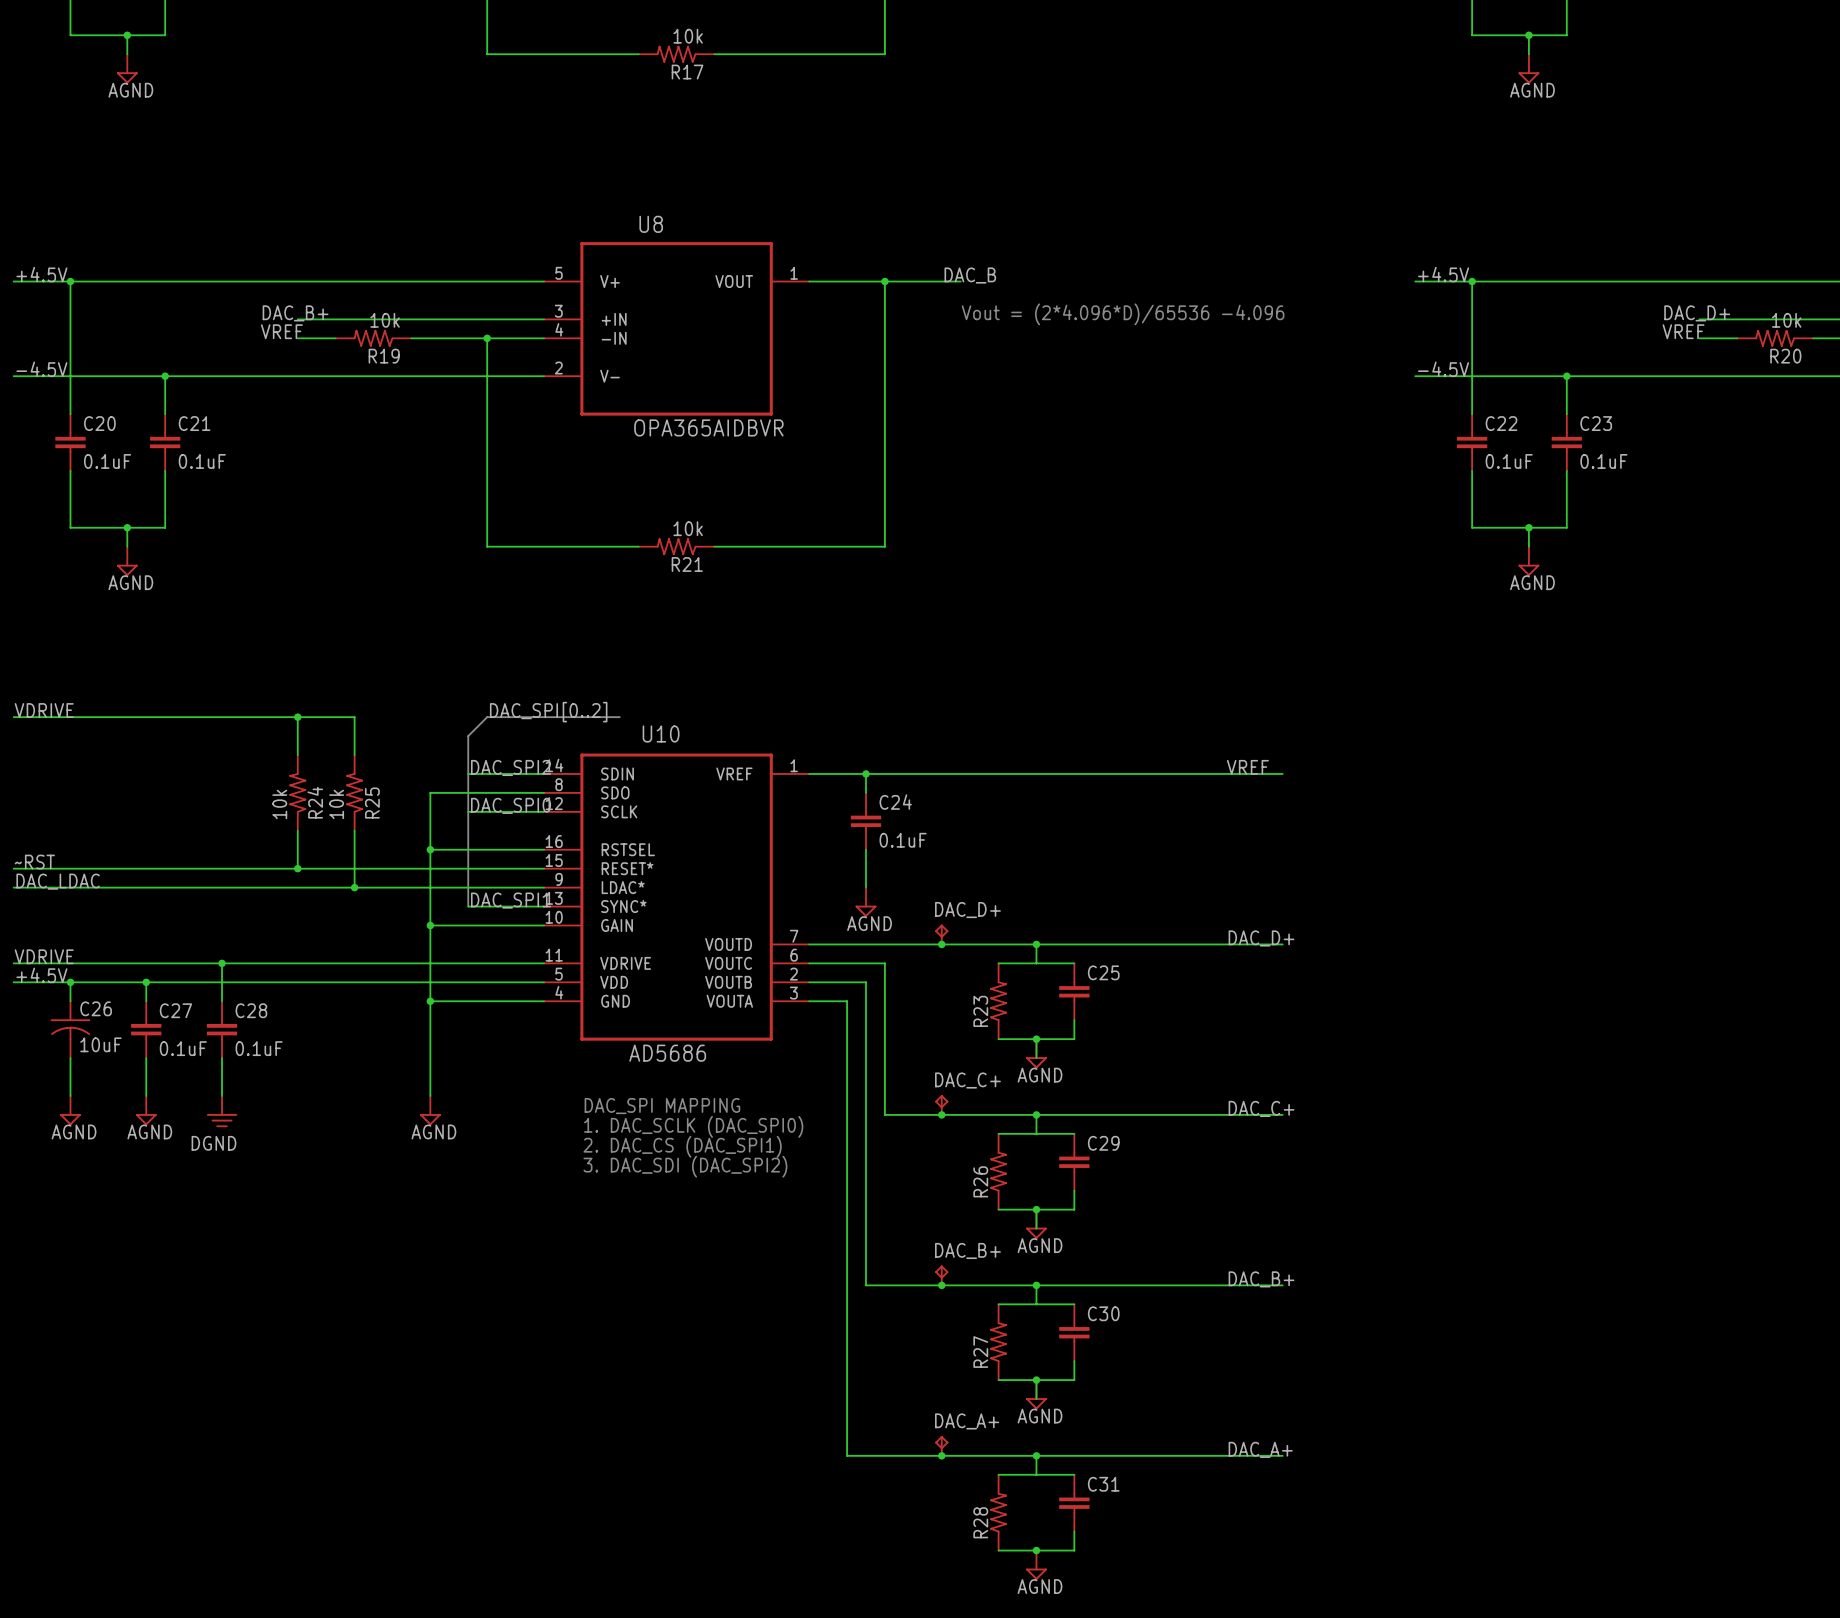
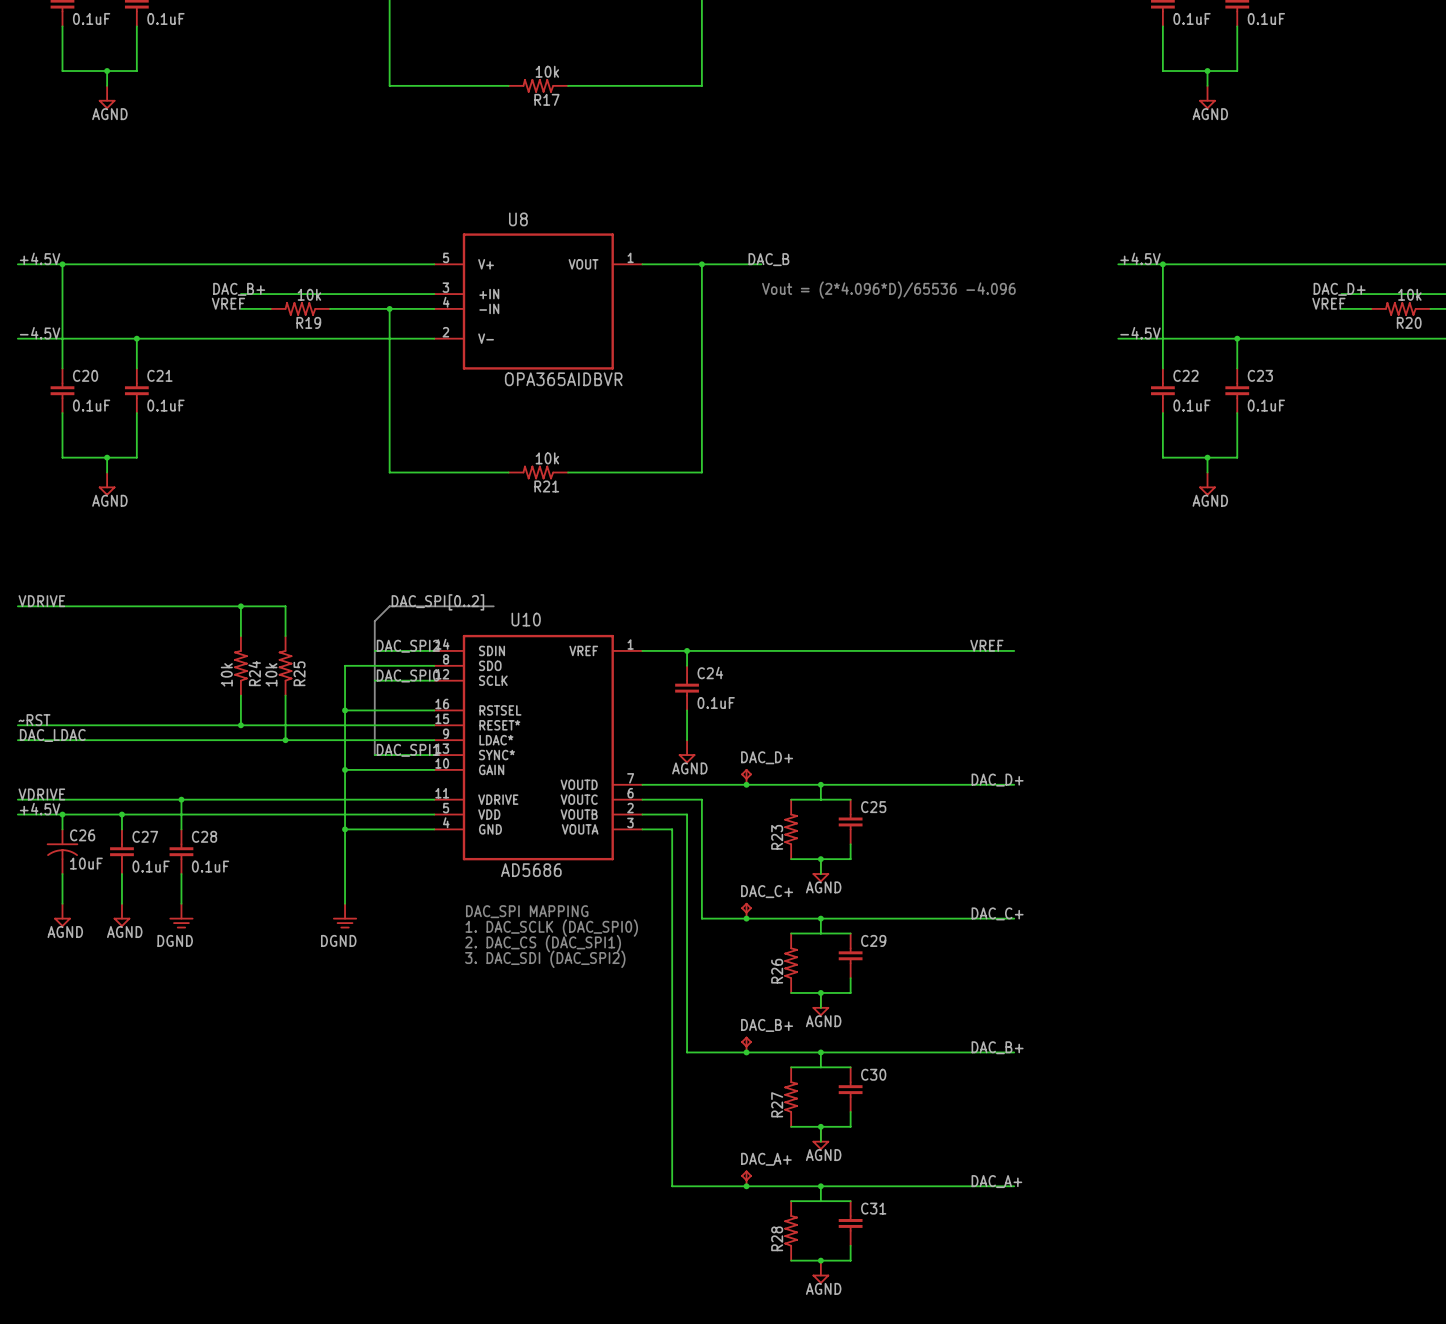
power symbol: AGND (430, 1110) -> DGND (345, 916)

